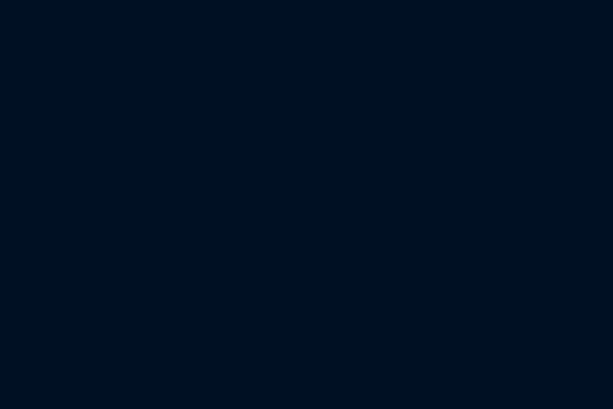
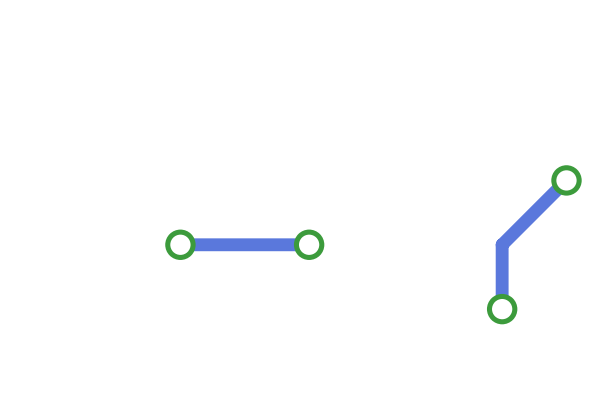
track: none -> (566, 180) (502, 244) (502, 309)
via: none -> (566, 180)
via: none -> (180, 244)
track: none -> (309, 244) (180, 244)
via: none -> (309, 244)
via: none -> (502, 309)

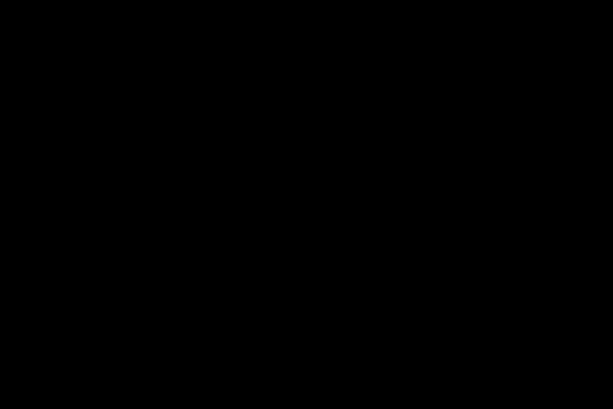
track: (566, 180) (502, 244) (502, 309) -> none
via: (566, 180) -> none
via: (180, 244) -> none
track: (309, 244) (180, 244) -> none
via: (309, 244) -> none
via: (502, 309) -> none

